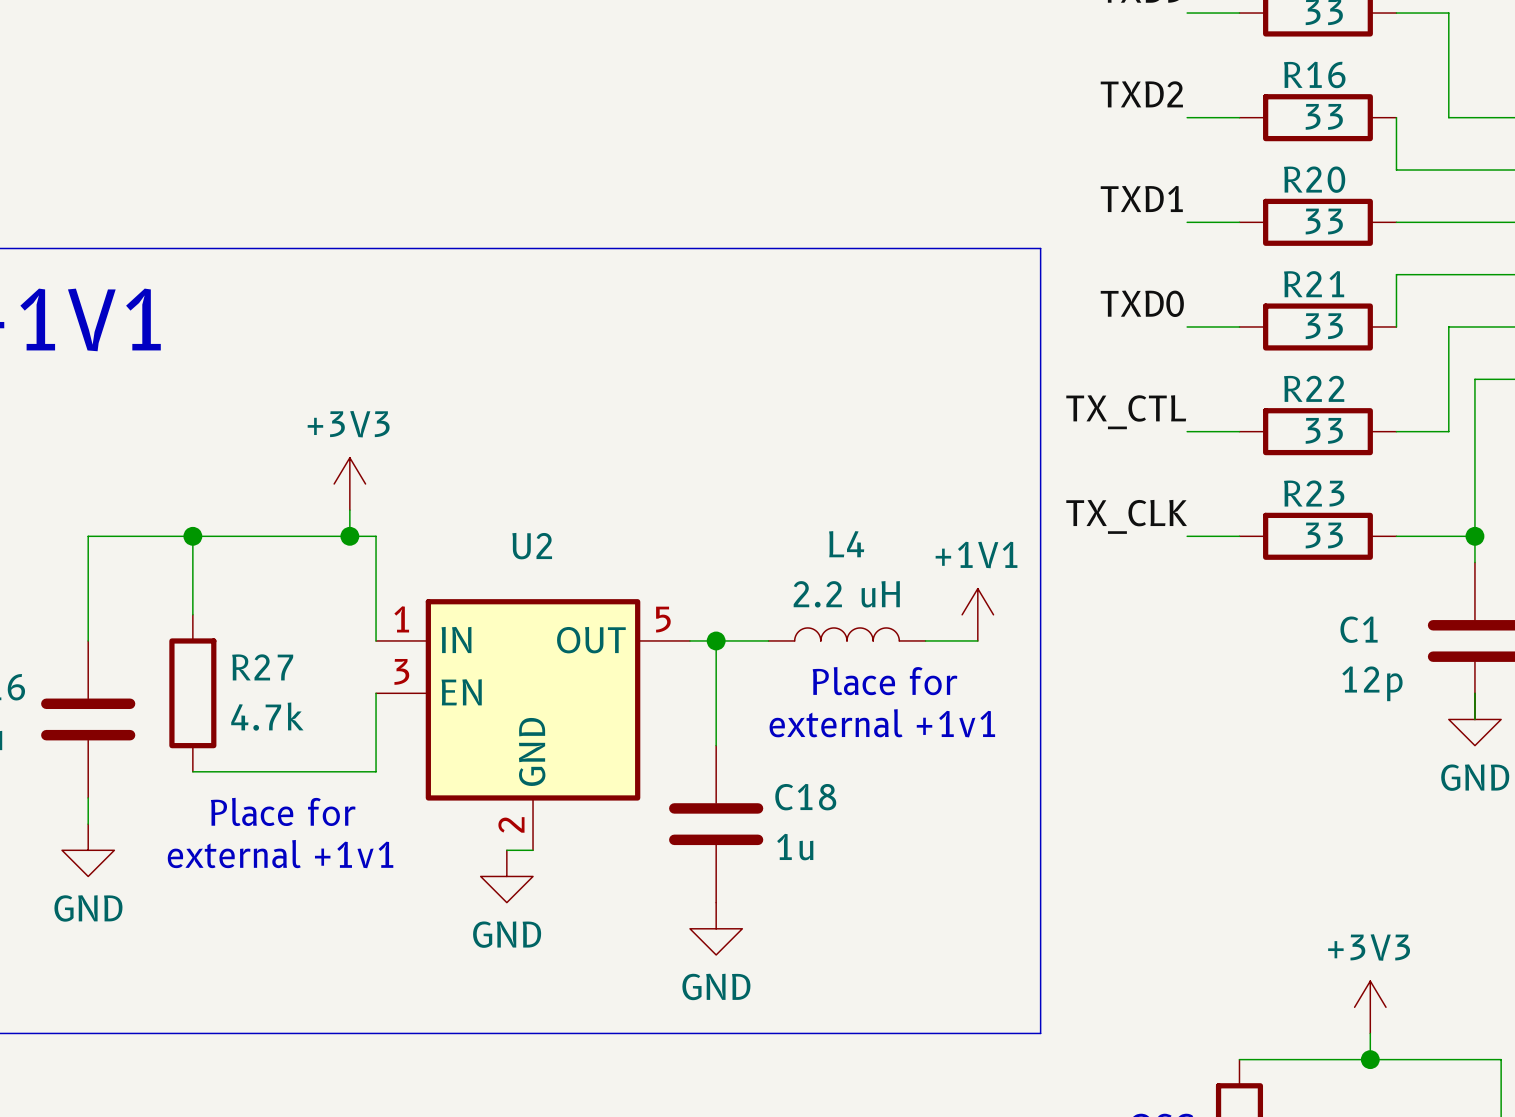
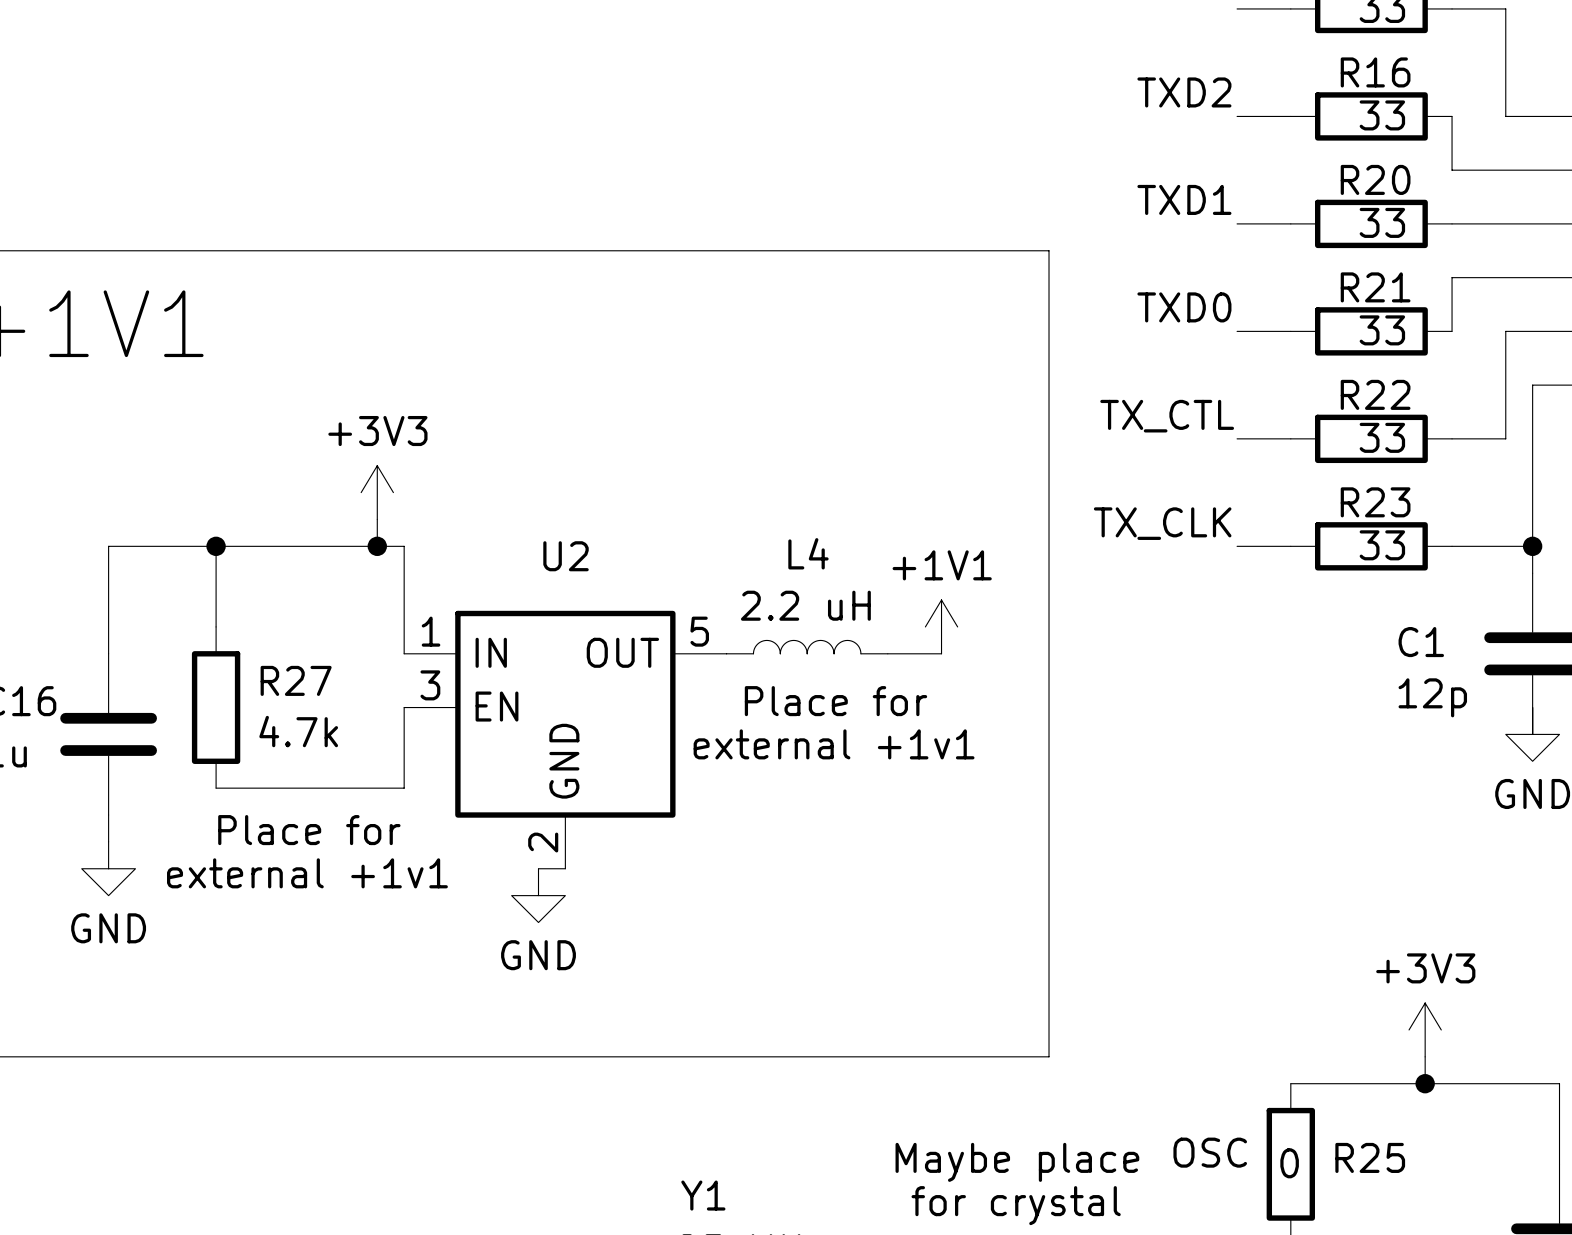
line: (1003, 248) (1040, 248) (1040, 1033) (1003, 1033) -> (1049, 250) (1049, 1056)
power symbol position: +1V1 (977, 614) -> +1V1 (941, 626)
L4 position: (847, 634) -> (807, 647)
wire: (690, 640) (768, 640) -> none
wire: (716, 640) (716, 745) -> none
junction: (716, 640) -> none
wire: (925, 640) (977, 640) -> (887, 653) (941, 653)
text position: Place for (884, 681) -> Place for (835, 701)
text position: external +1v1 (882, 723) -> external +1v1 (834, 744)
C18: 1u (716, 824) -> none
power symbol: GND (716, 928) -> none

